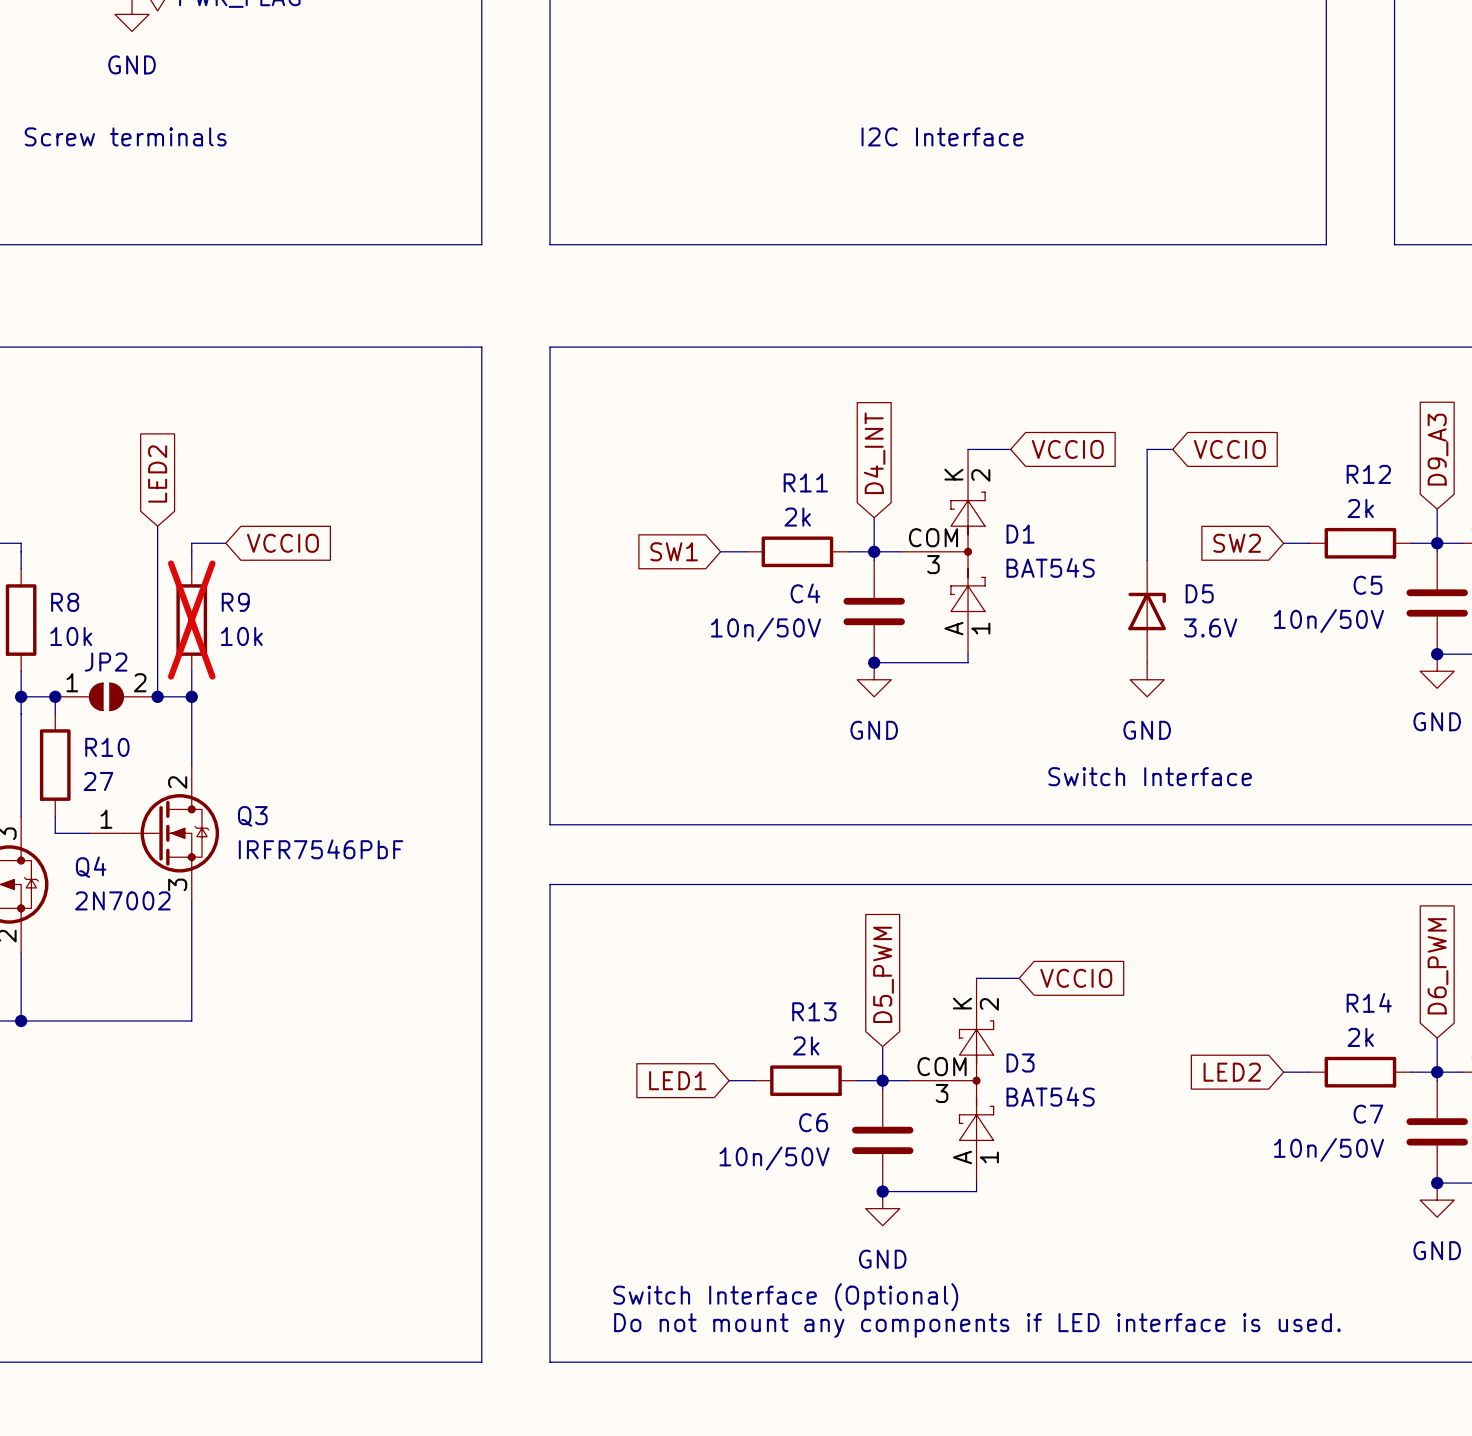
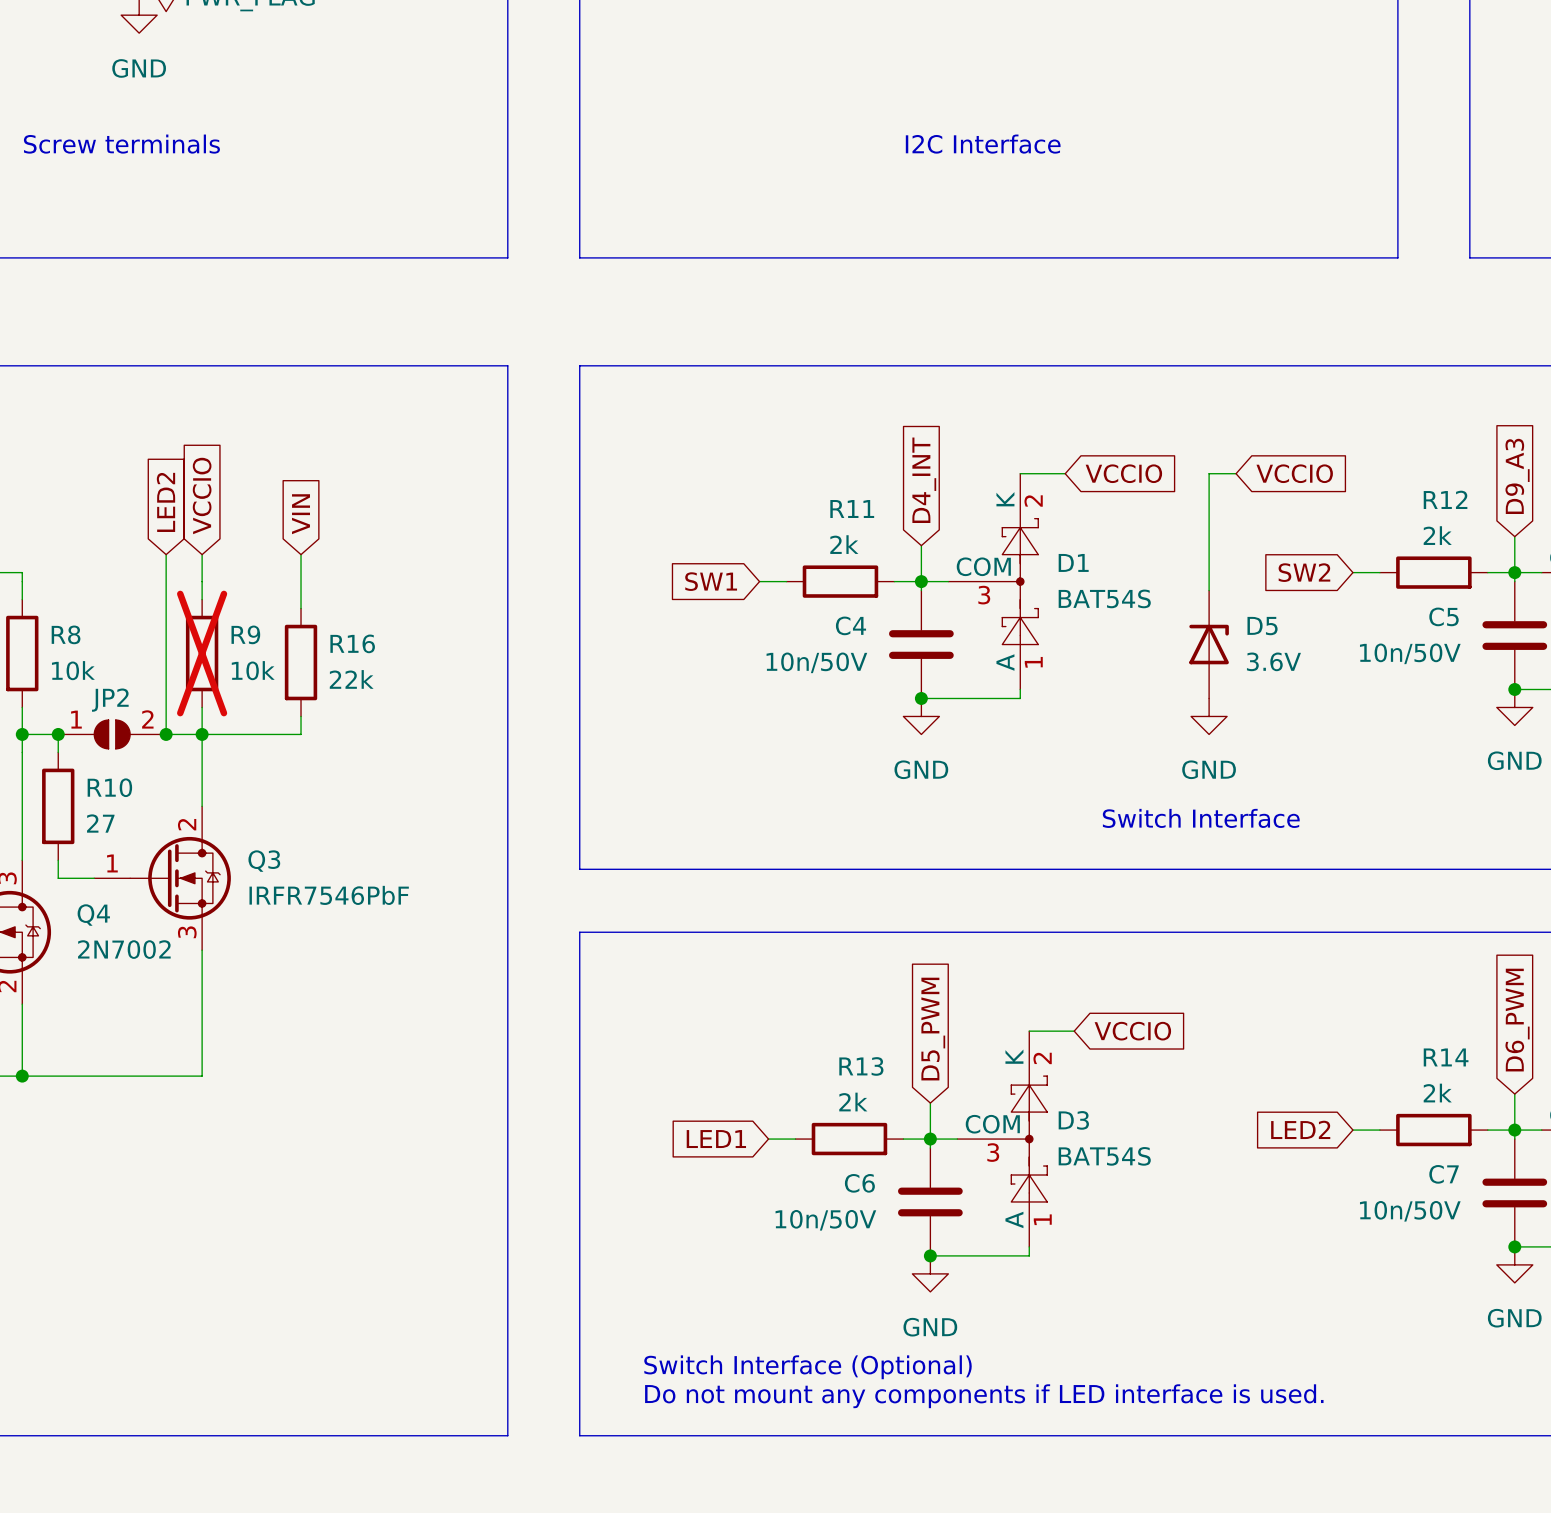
global label: none -> VIN (301, 514)
wire: none -> (301, 554) (301, 608)
wire: (191, 543) (225, 543) -> (202, 572) (202, 554)
global label rotation: 0° (282, 543) -> 90° counterclockwise (202, 495)
R16: none -> 22k (301, 662)
wire: none -> (301, 716) (301, 734) (202, 734)

